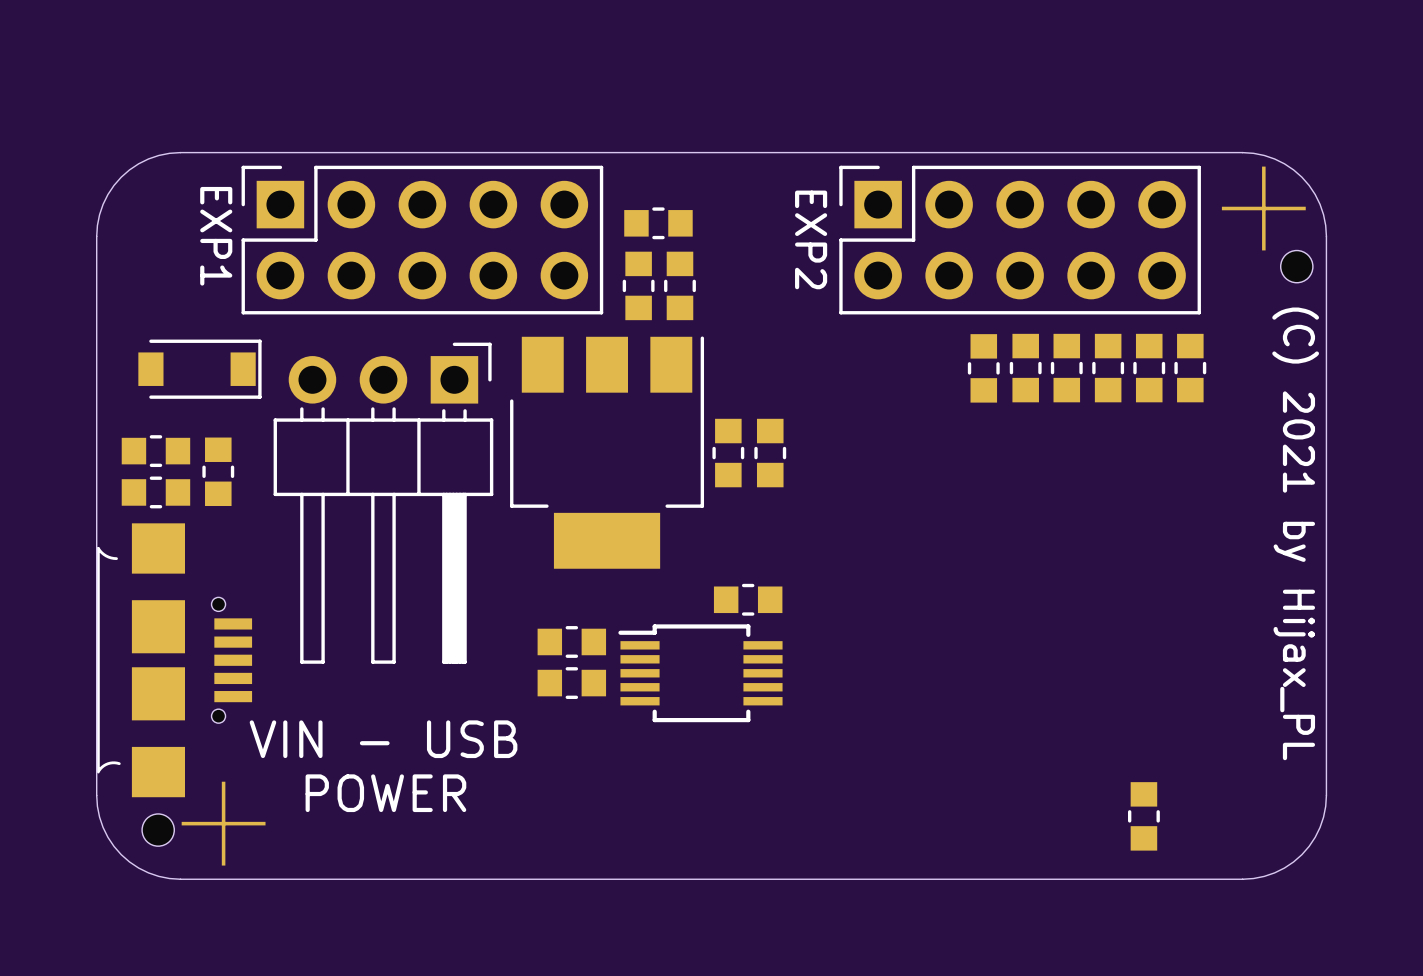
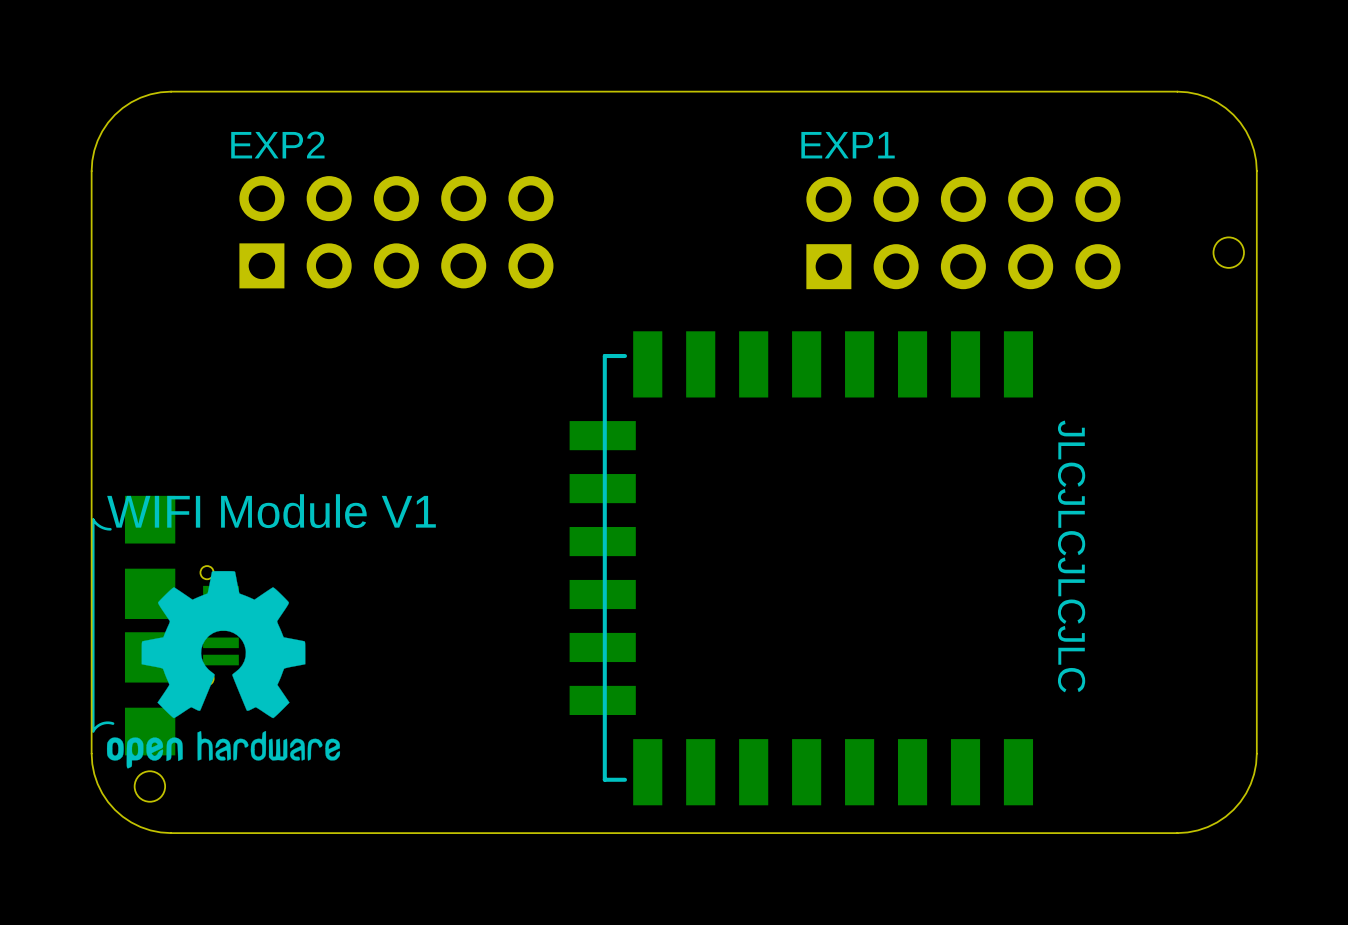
text: none -> EXP2 (277, 144)
text: none -> EXP1 (848, 145)
part: (1263, 208) -> none
part: (658, 223) -> none
board edge: (1326, 236) (1320, 204) (1301, 177) (1274, 158) (1242, 152) (169, 153) (148, 158) (121, 177) (103, 204) (96, 236) -> (1256, 224) (1256, 160) (1246, 131) (1233, 114) (1217, 102) (1197, 94) (1177, 91) (160, 92) (131, 102) (114, 114) (102, 131) (92, 160) (91, 224)
EXP1 side: bottom (422, 240) -> top (396, 232)
EXP2 side: bottom (1020, 240) -> top (963, 233)
part: (638, 285) -> none
part: (679, 285) -> none
part: (983, 368) -> none
part: (1025, 368) -> none
part: (1066, 368) -> none
part: (1108, 368) -> none
part: (1149, 368) -> none
part: (1190, 368) -> none
part: (199, 369) -> none
part: (155, 451) -> none
part: (607, 452) -> none
part: (728, 453) -> none
part: (770, 453) -> none
part: (218, 471) -> none
part: (155, 492) -> none
part: (383, 503) -> none
text: (C) 2021 by Hijax_PL (1295, 533) -> none
text: none -> WIFI Module V1 (271, 511)
text: none -> JLCJLCJLCJLC (1071, 556)
part: (748, 599) -> none
part: none -> (801, 568)
drawing: none -> [106, 571, 341, 769]
part: (571, 641) -> none
part: (700, 673) -> none
part: (571, 683) -> none
text: VIN - USB (383, 739) -> none
text: POWER (385, 793) -> none
part: (1143, 816) -> none
part: (223, 823) -> none

